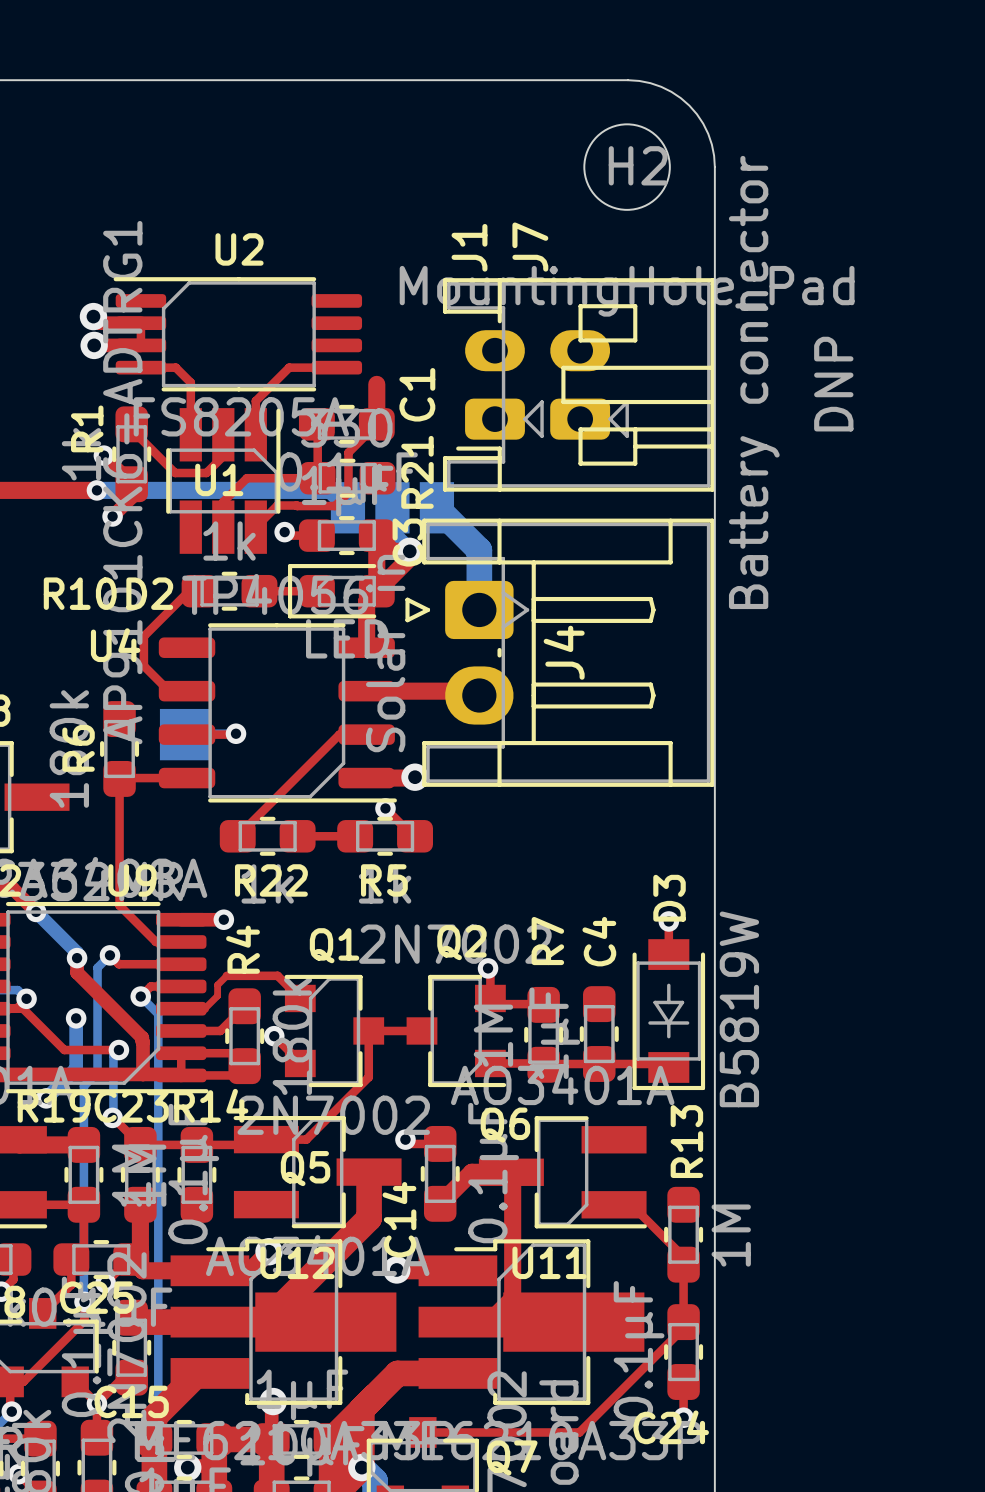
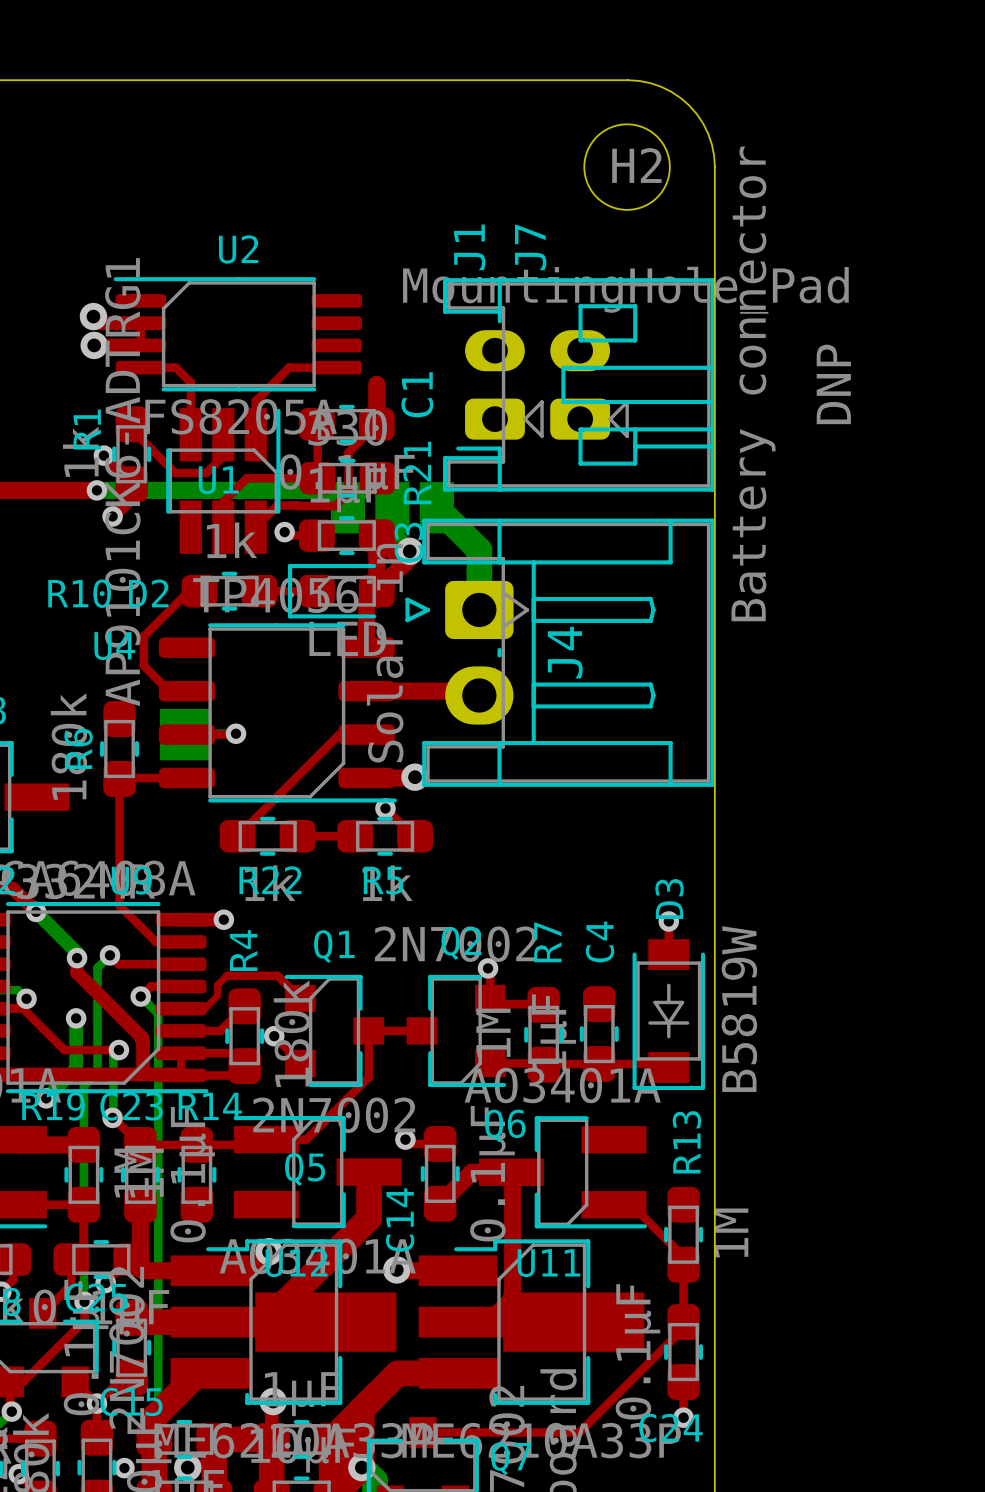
via: none -> (124, 1468)

